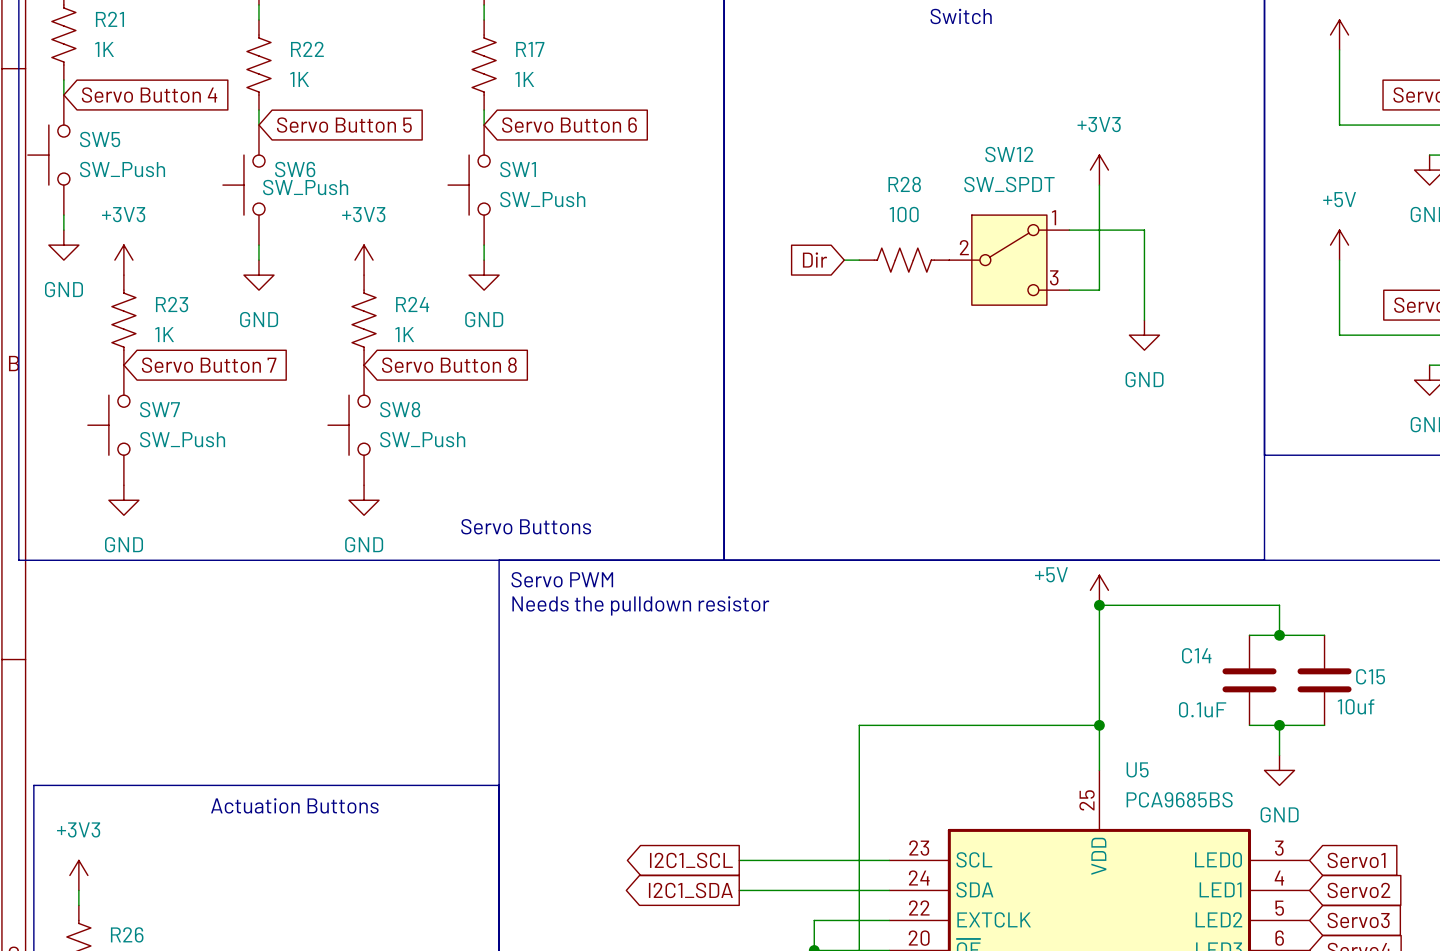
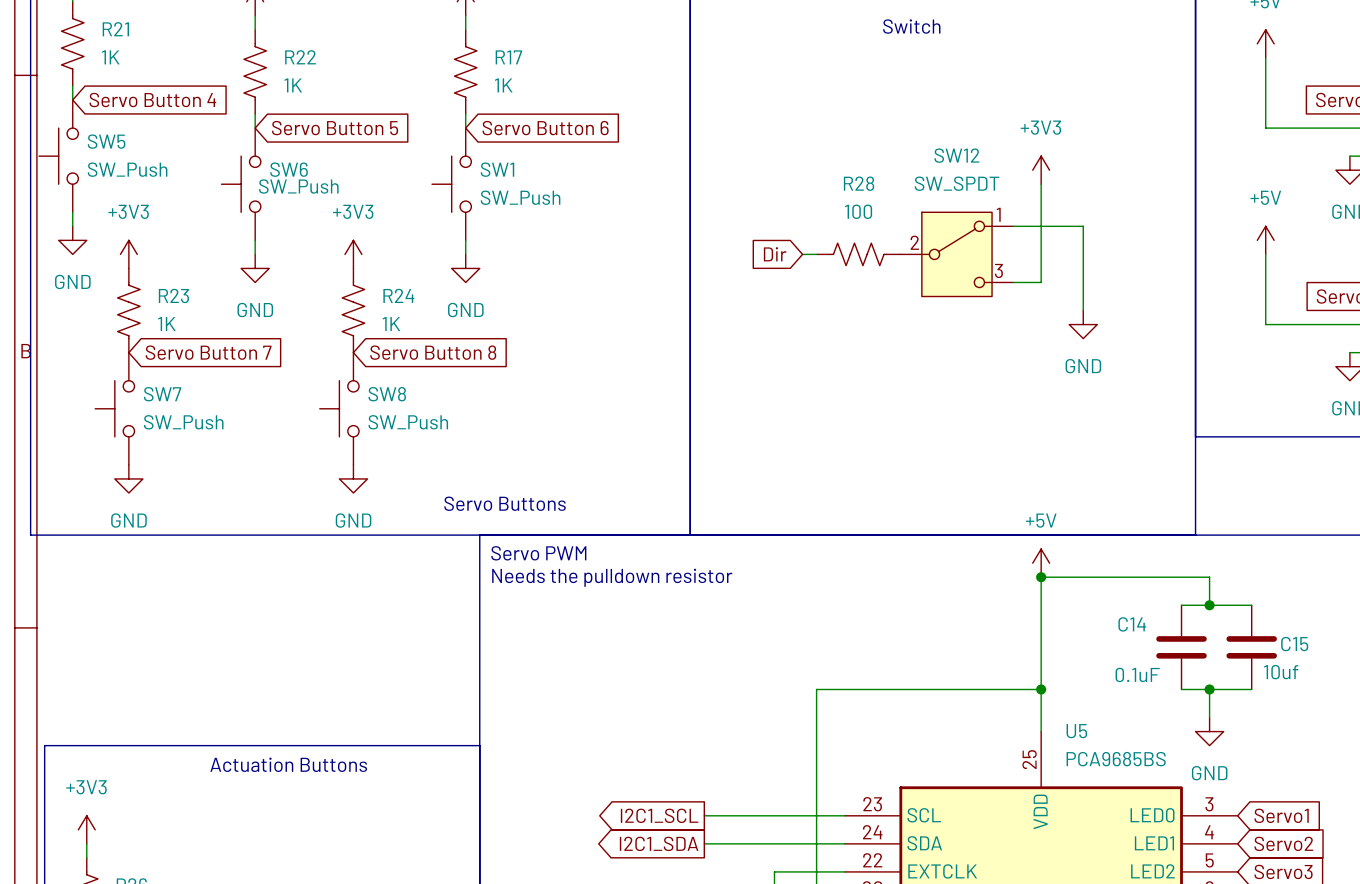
power symbol text position: +5V (1051, 574) -> +5V (1041, 520)

